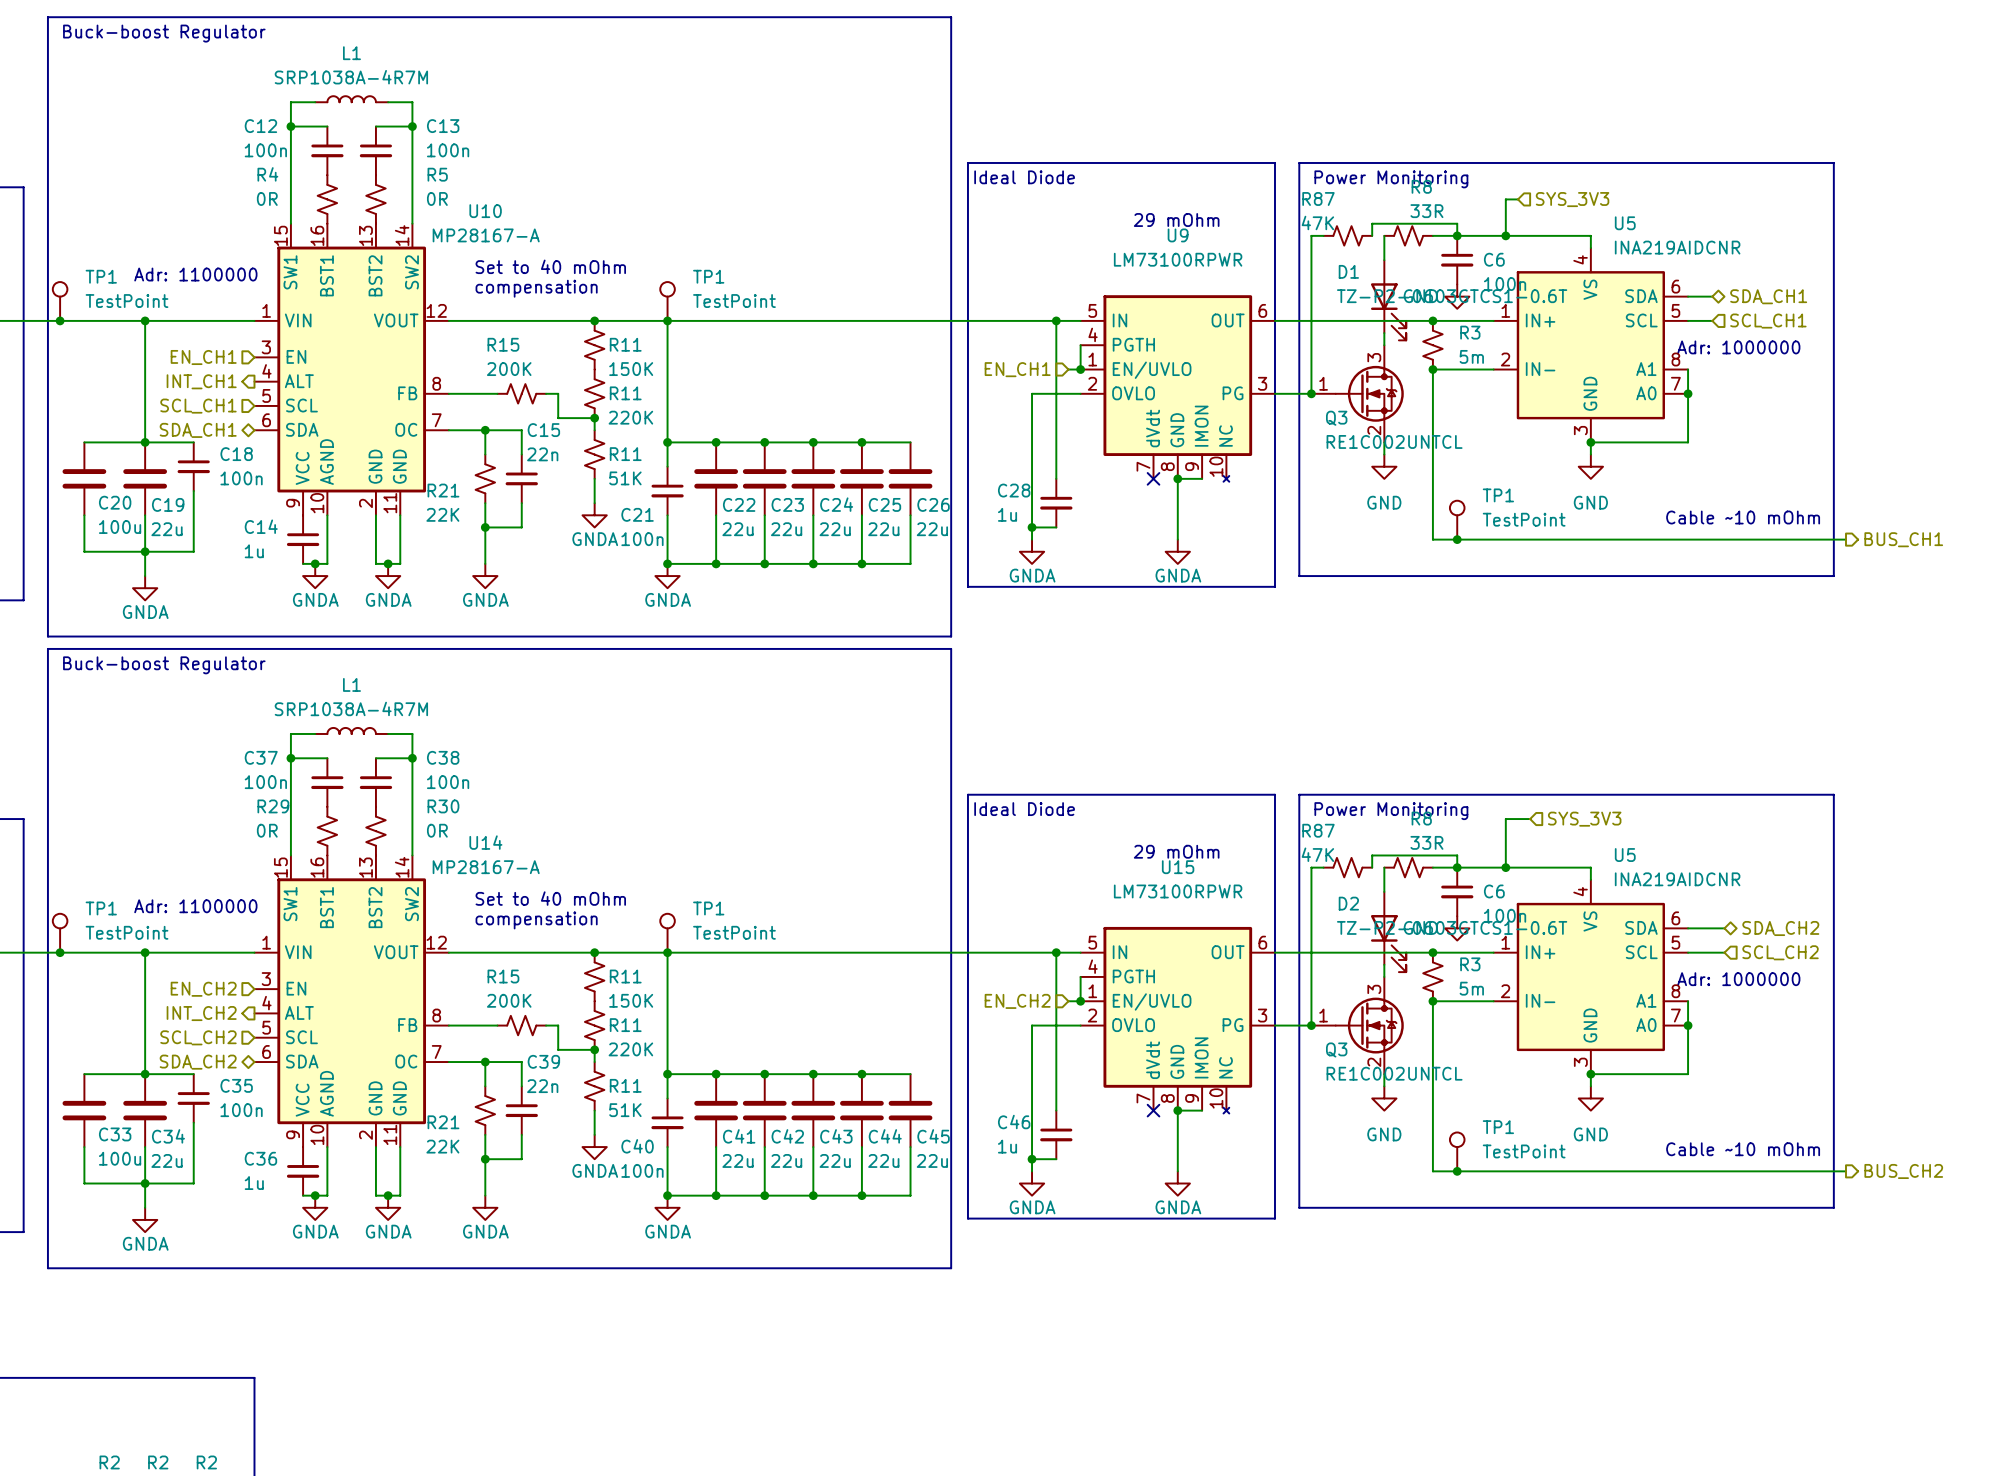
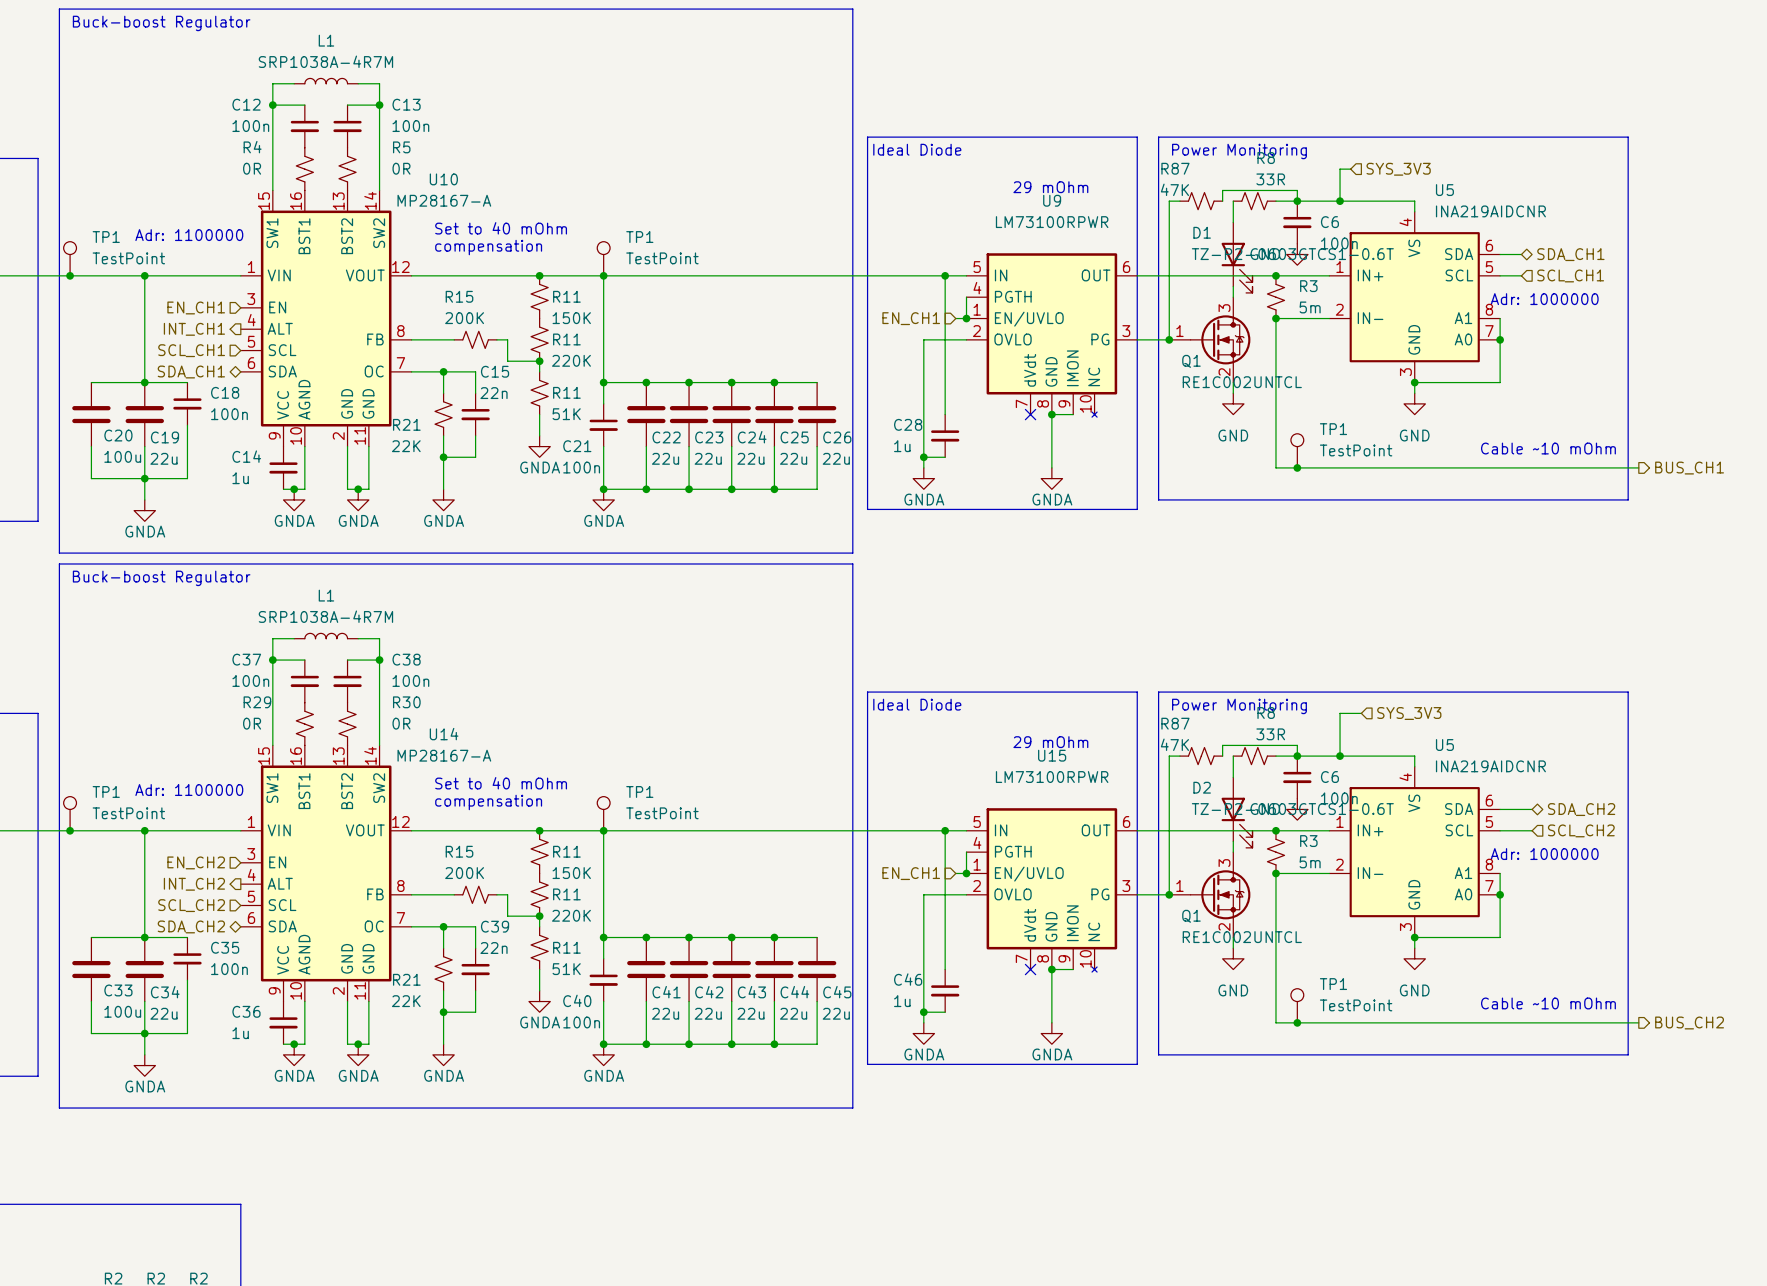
Q3 name: Q3 (1336, 418) -> Q1 (1191, 361)
hierarchical label: EN_CH2 (1017, 1001) -> EN_CH1 (911, 873)
Q3 name: Q3 (1336, 1049) -> Q1 (1191, 916)

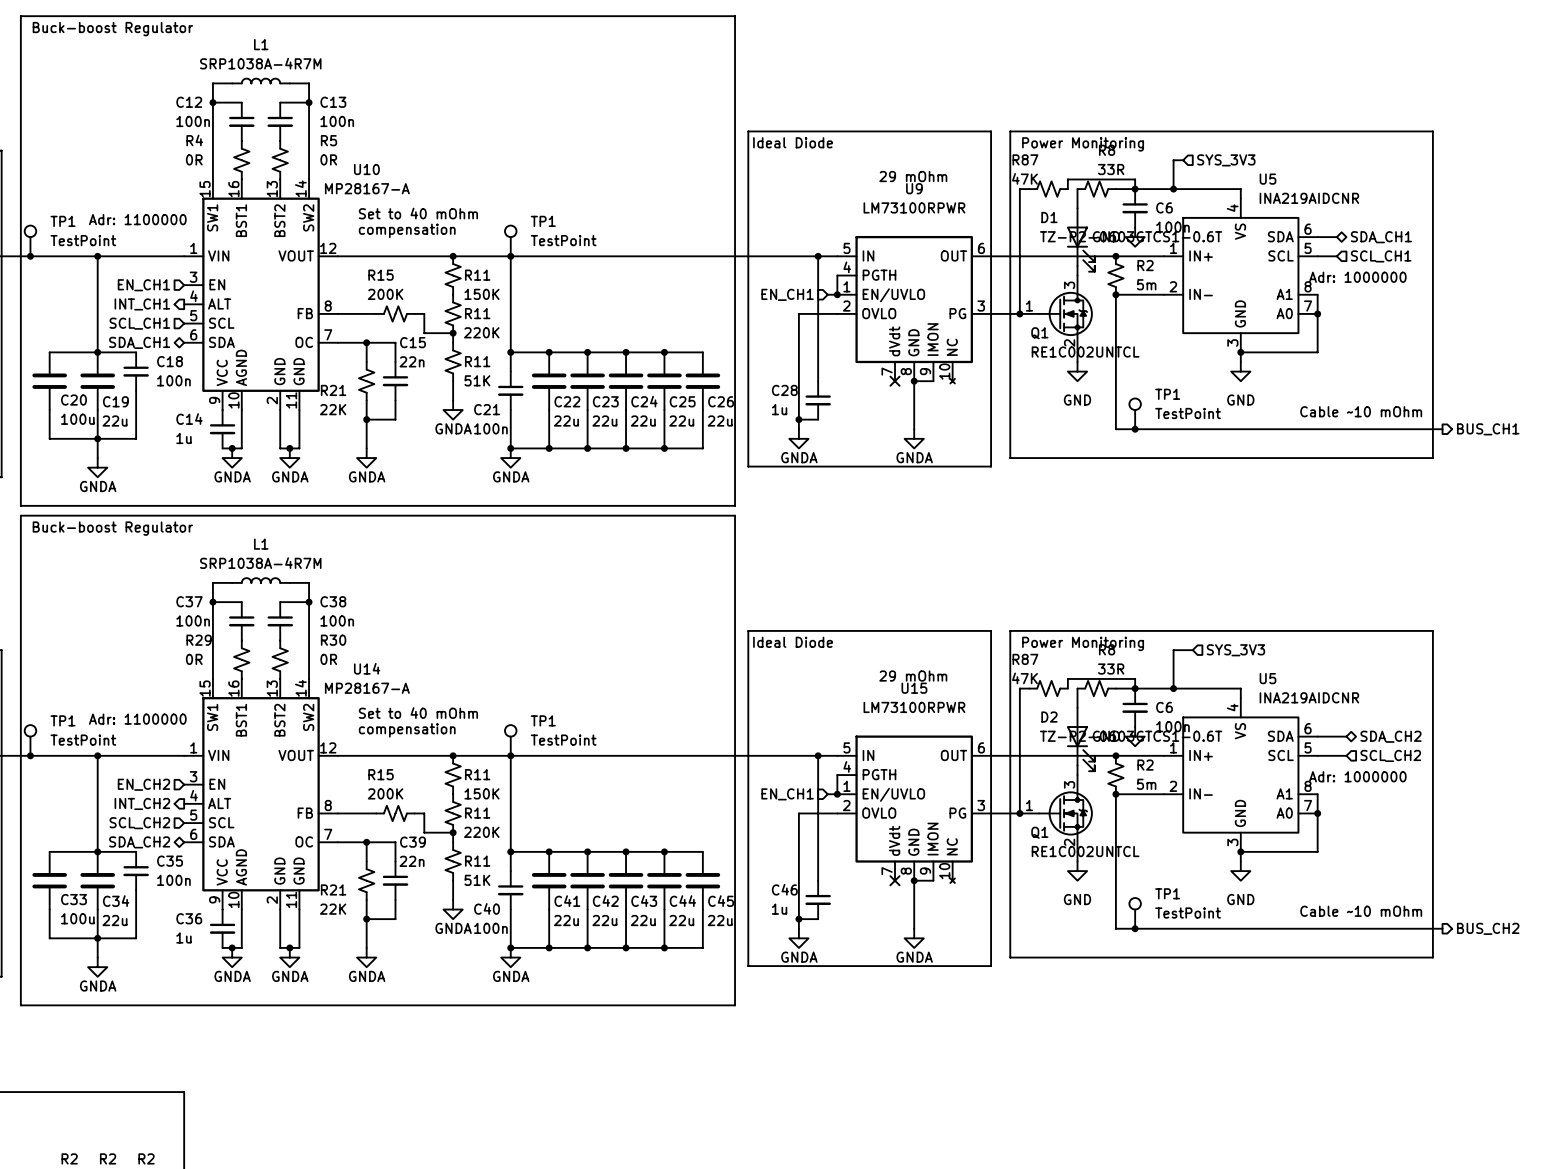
R3 name: R3 (1308, 286) -> R2 (1145, 265)
R3 name: R3 (1308, 841) -> R2 (1145, 765)

